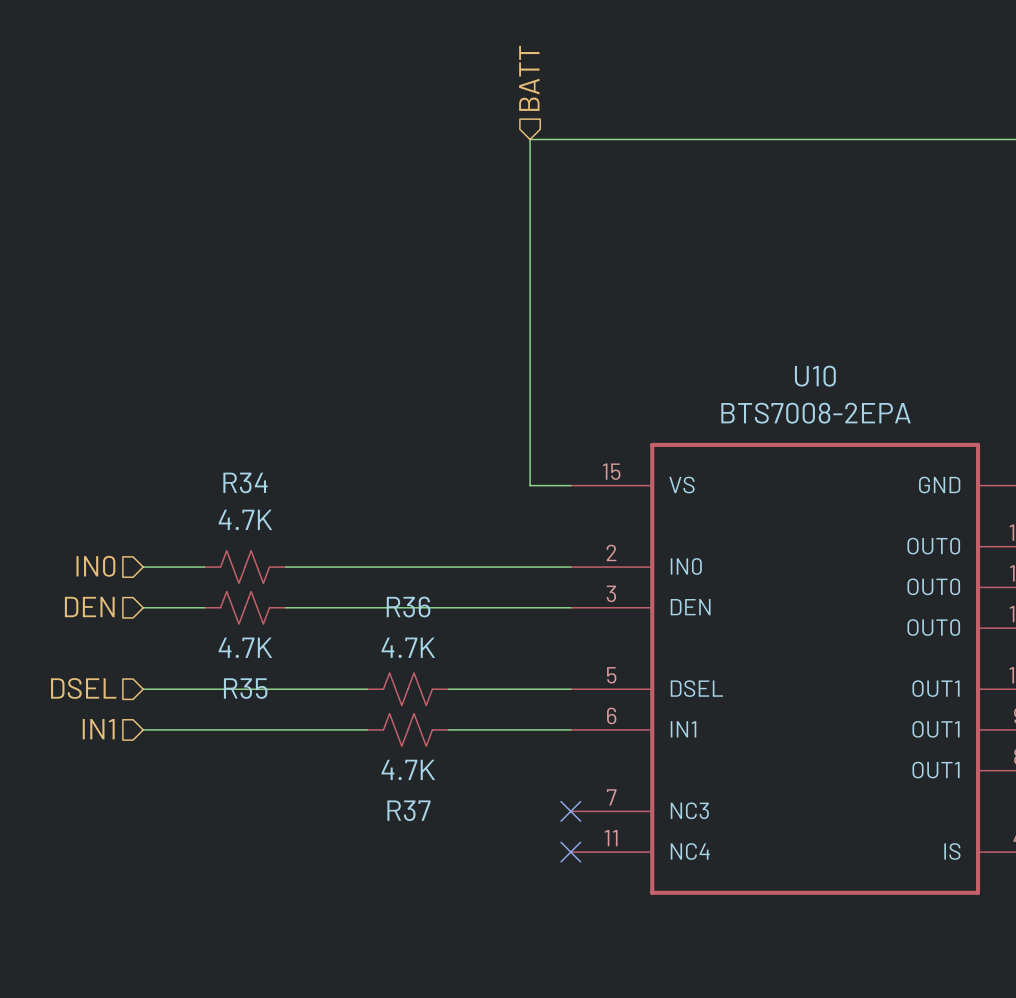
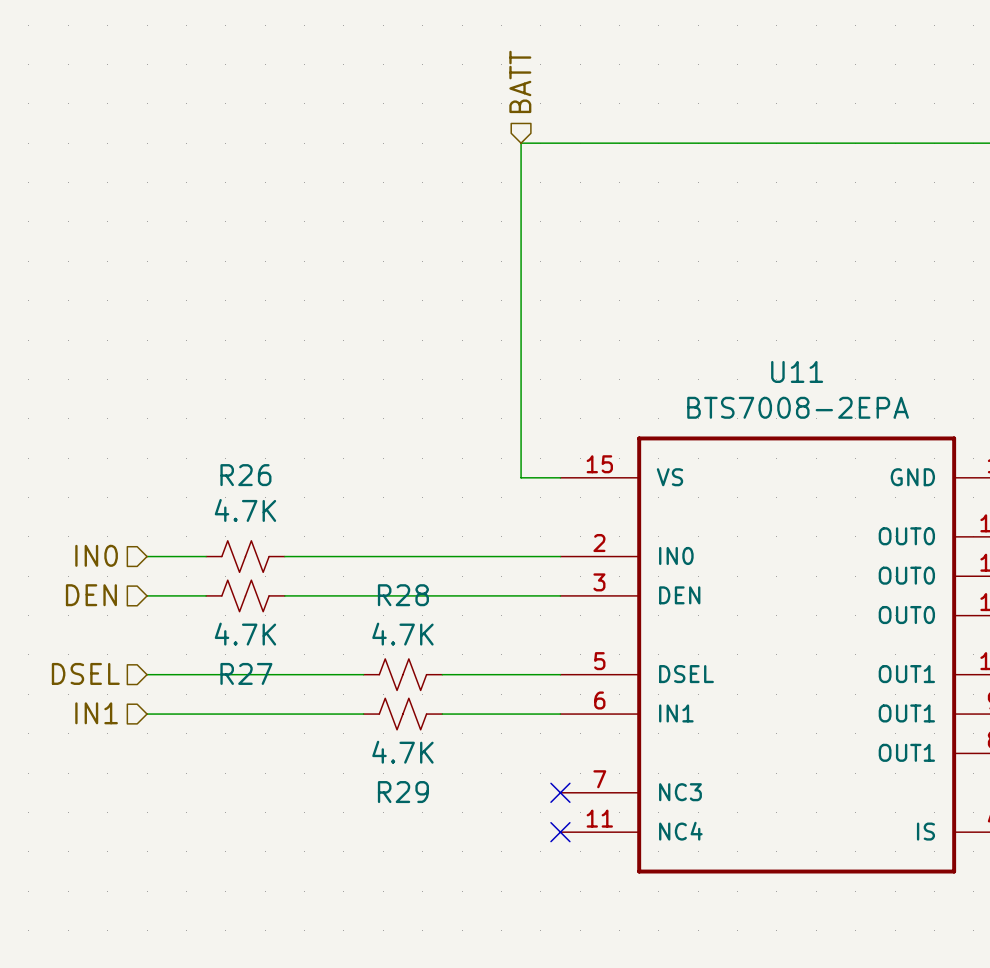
U10 name: U10 (815, 376) -> U11 (797, 371)
R34 name: R34 (245, 482) -> R26 (245, 475)
R36 name: R36 (408, 607) -> R28 (403, 595)
R35 name: R35 (245, 688) -> R27 (246, 673)
R37 name: R37 (408, 810) -> R29 (403, 792)

